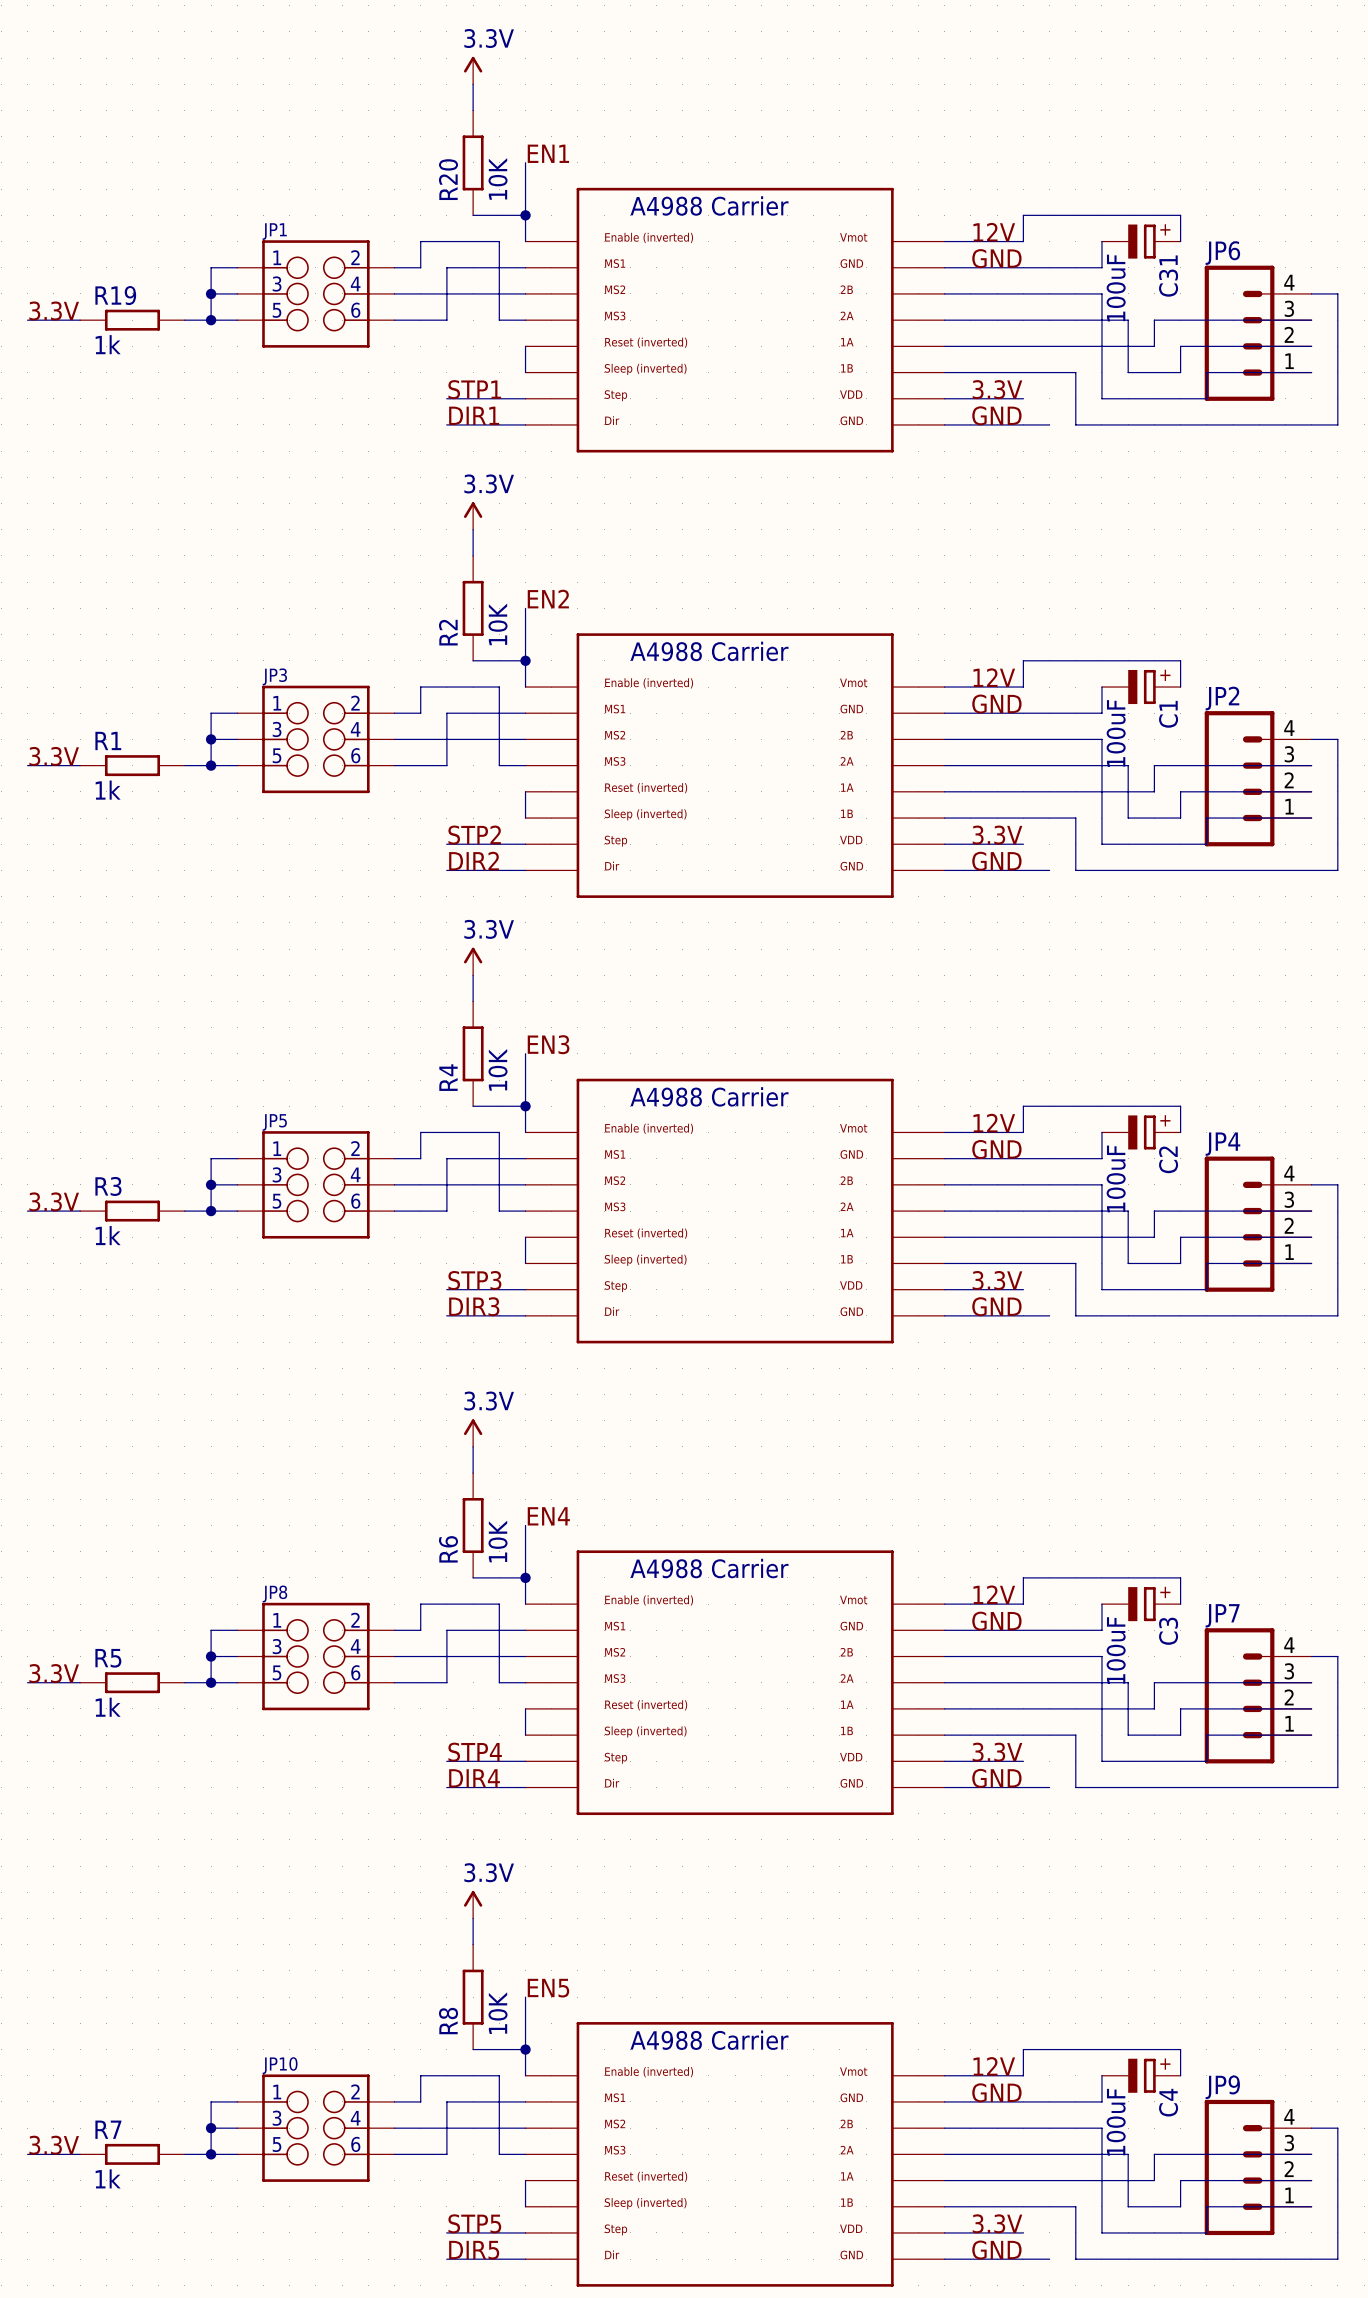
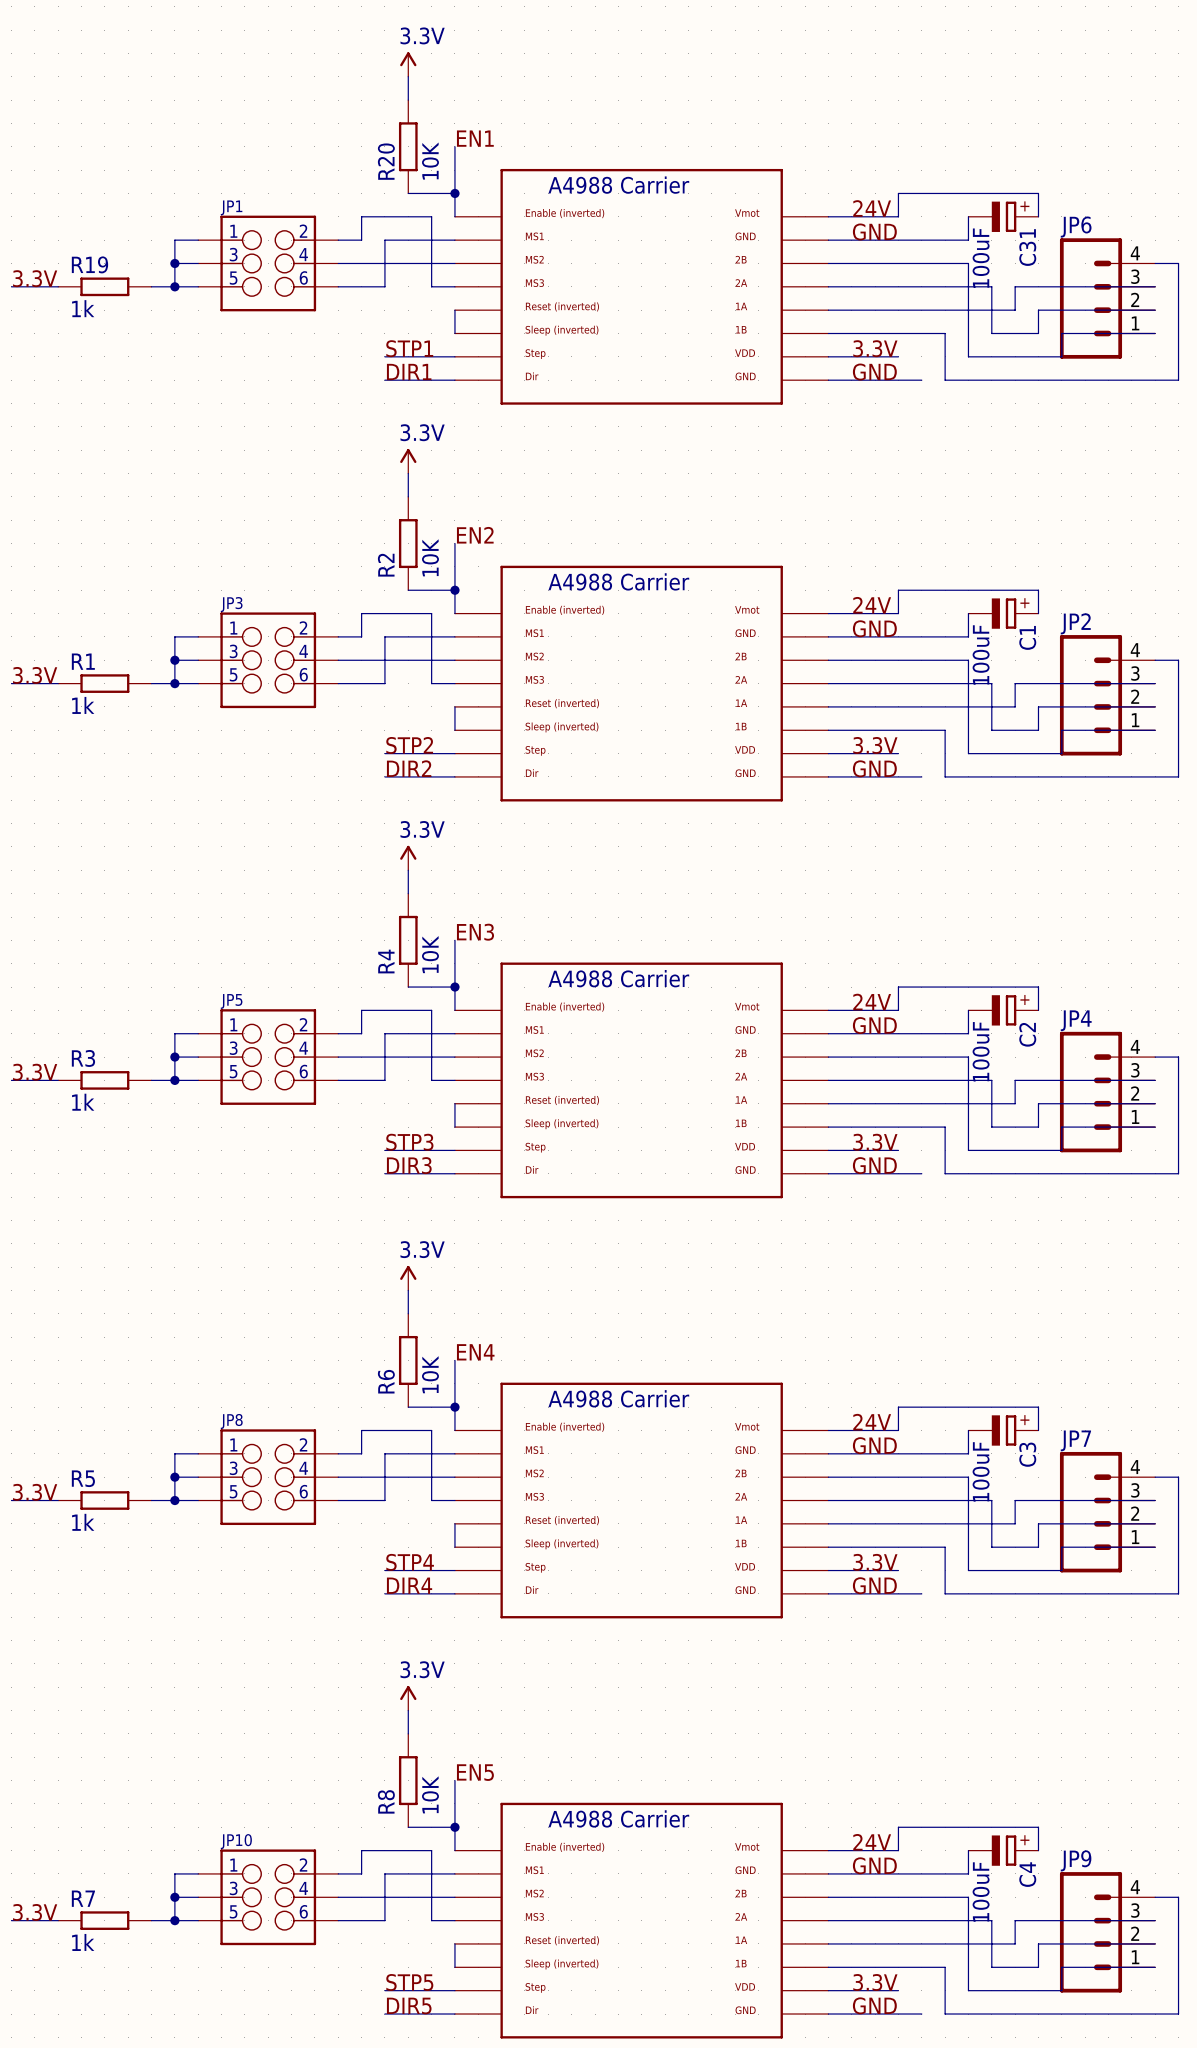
label: 12V (994, 232) -> 24V (872, 208)
label: 12V (994, 677) -> 24V (872, 605)
label: 12V (994, 1123) -> 24V (872, 1002)
label: 12V (994, 1594) -> 24V (872, 1422)
label: 12V (994, 2066) -> 24V (872, 1842)

